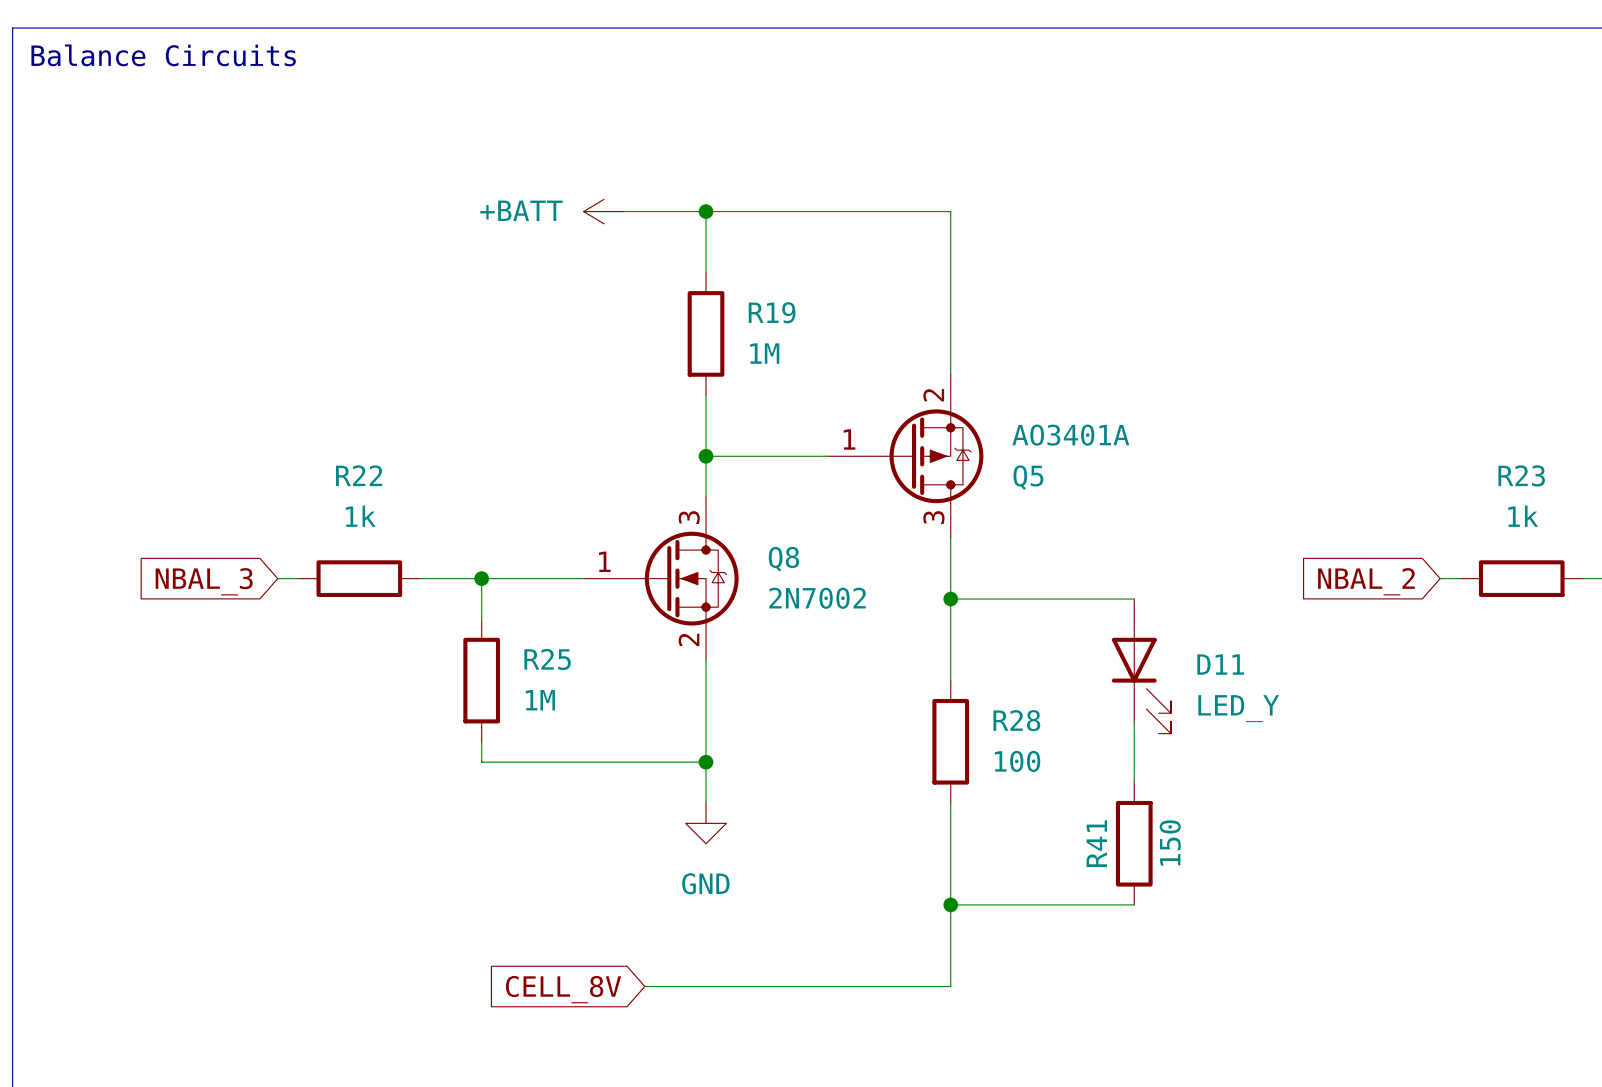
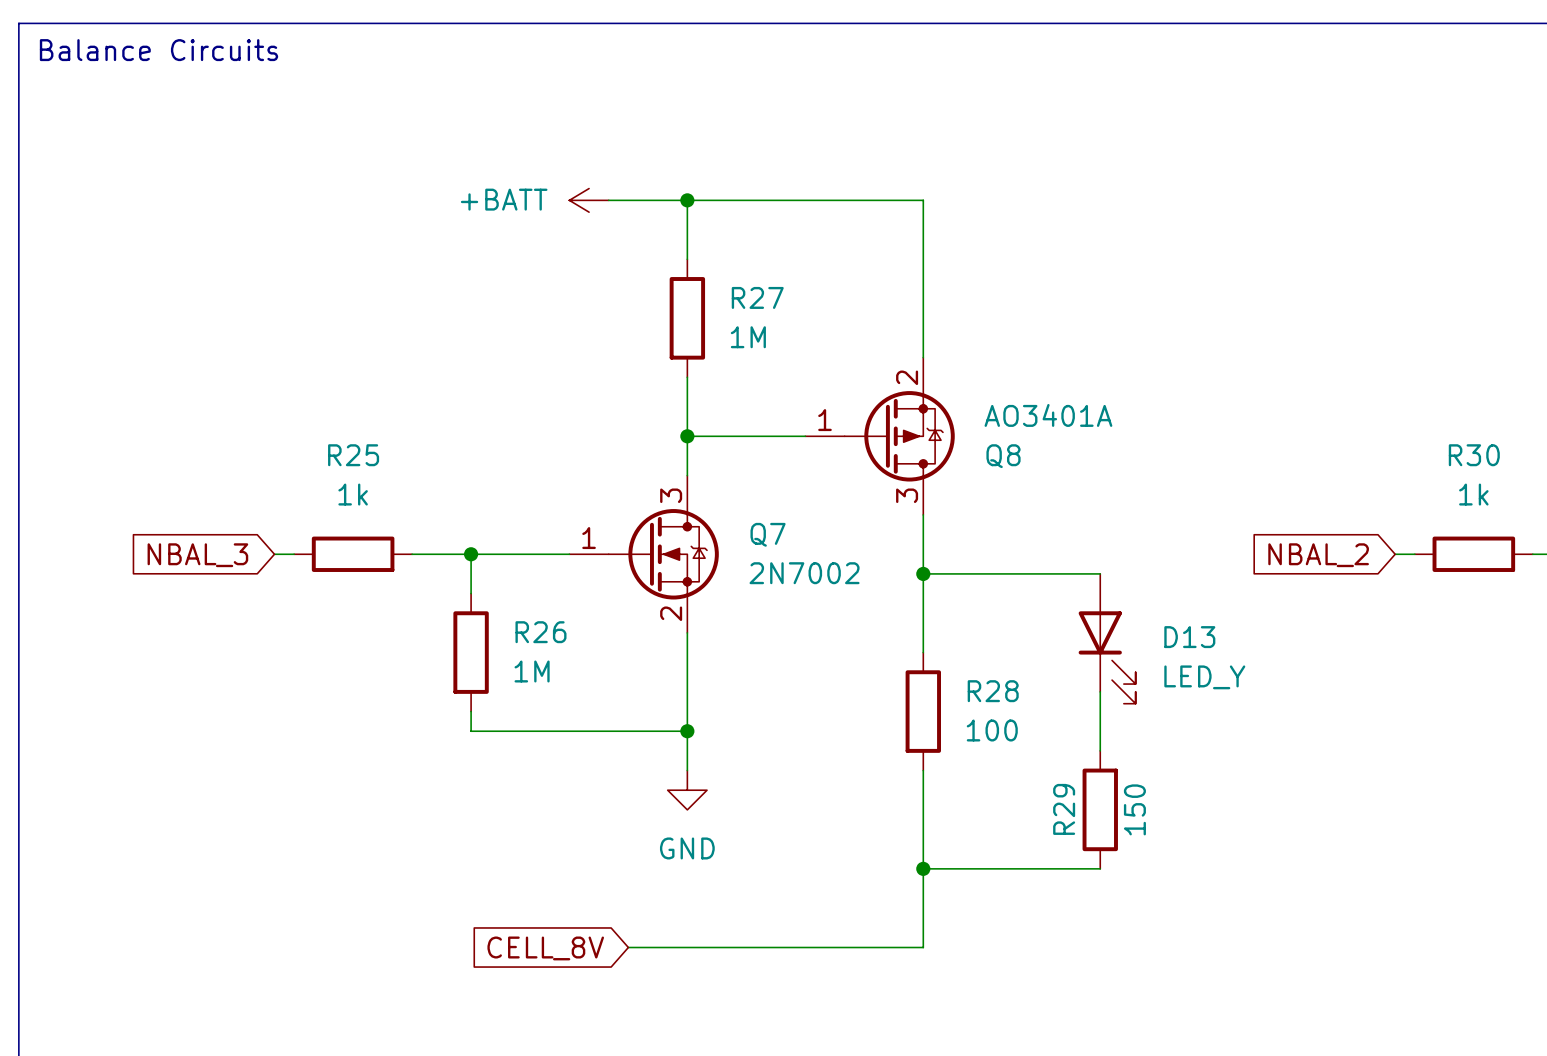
R19 name: R19 (772, 312) -> R27 (757, 297)
R22 name: R22 (359, 475) -> R25 (353, 455)
R23 name: R23 (1521, 475) -> R30 (1474, 455)
Q5 name: Q5 (1028, 477) -> Q8 (1003, 456)
Q8 name: Q8 (783, 559) -> Q7 (768, 534)
R25 name: R25 (547, 659) -> R26 (540, 632)
D11 name: D11 (1220, 664) -> D13 (1189, 637)
R41 name: R41 (1096, 843) -> R29 (1064, 809)

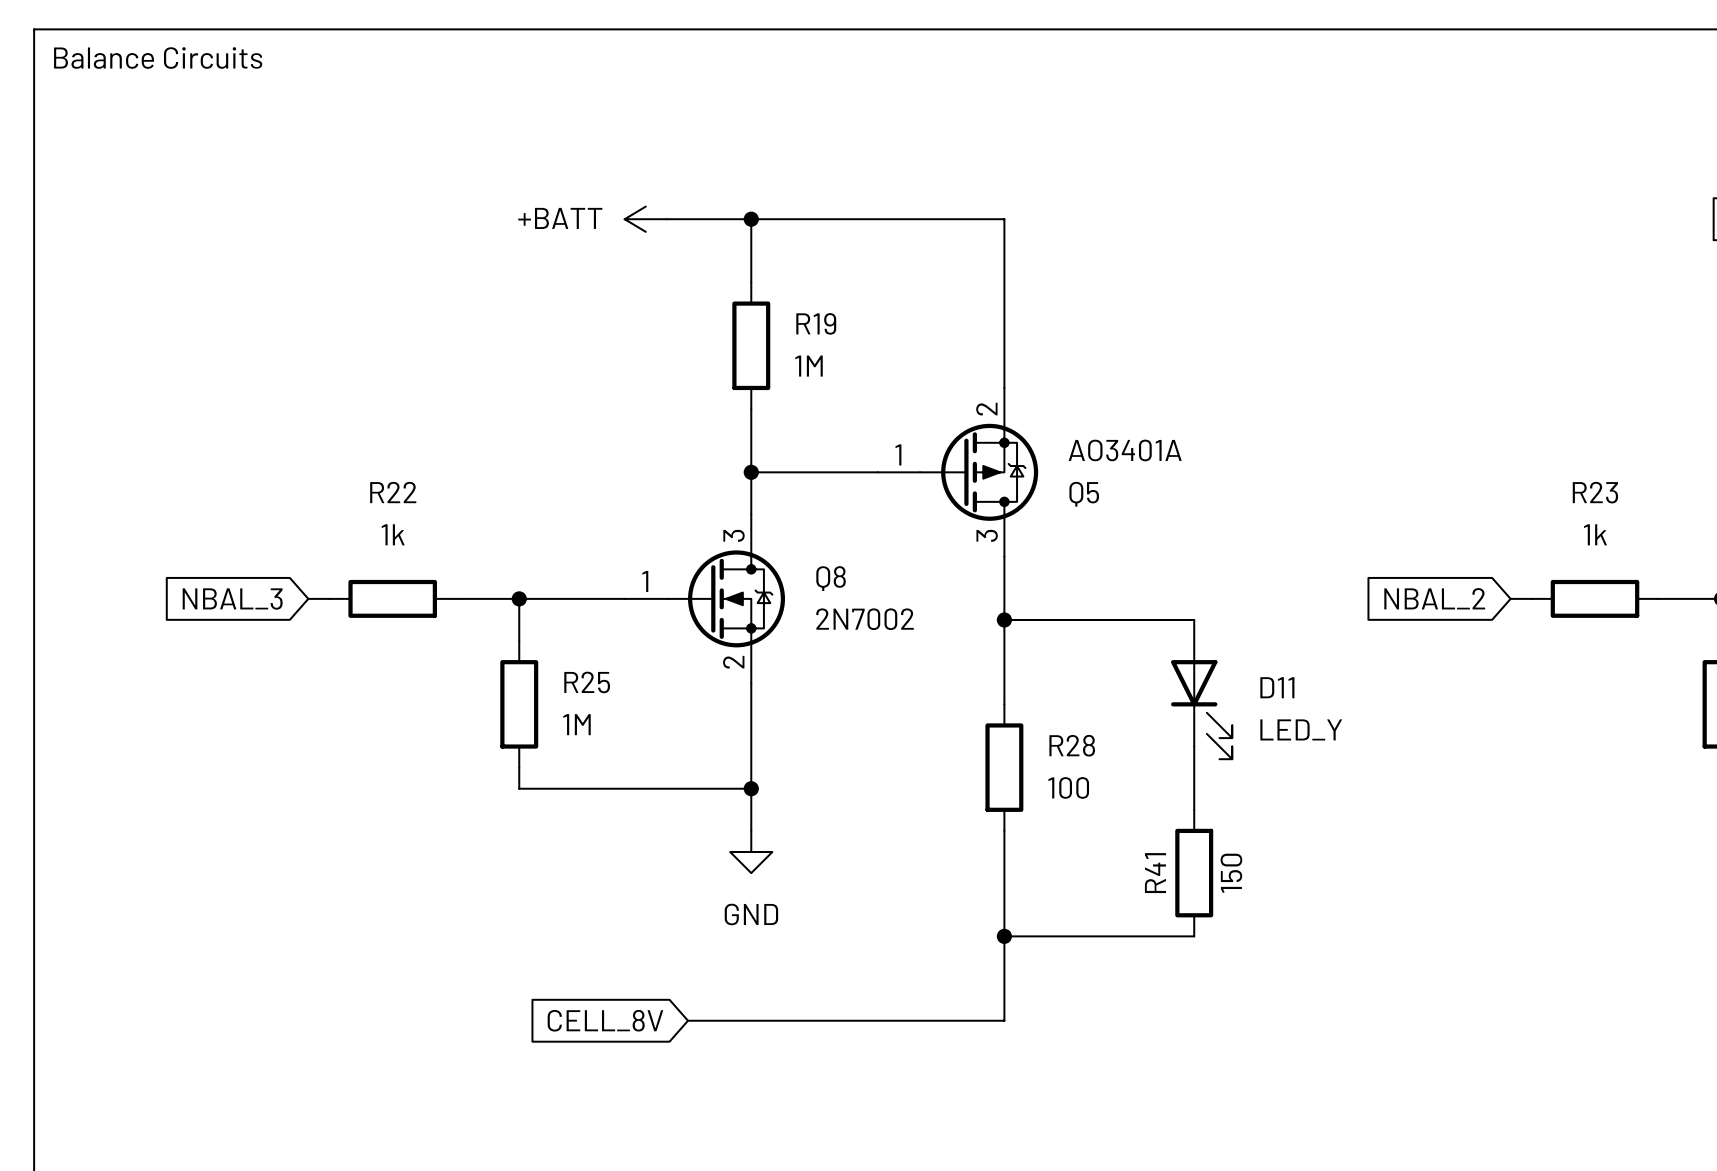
R27 name: R27 (757, 297) -> R19 (816, 323)
R25 name: R25 (353, 455) -> R22 (393, 492)
R30 name: R30 (1474, 455) -> R23 (1595, 492)
Q8 name: Q8 (1003, 456) -> Q5 (1084, 494)
Q7 name: Q7 (768, 534) -> Q8 (831, 578)
R26 name: R26 (540, 632) -> R25 (587, 682)
D13 name: D13 (1189, 637) -> D11 (1277, 687)
R29 name: R29 (1064, 809) -> R41 (1155, 873)

